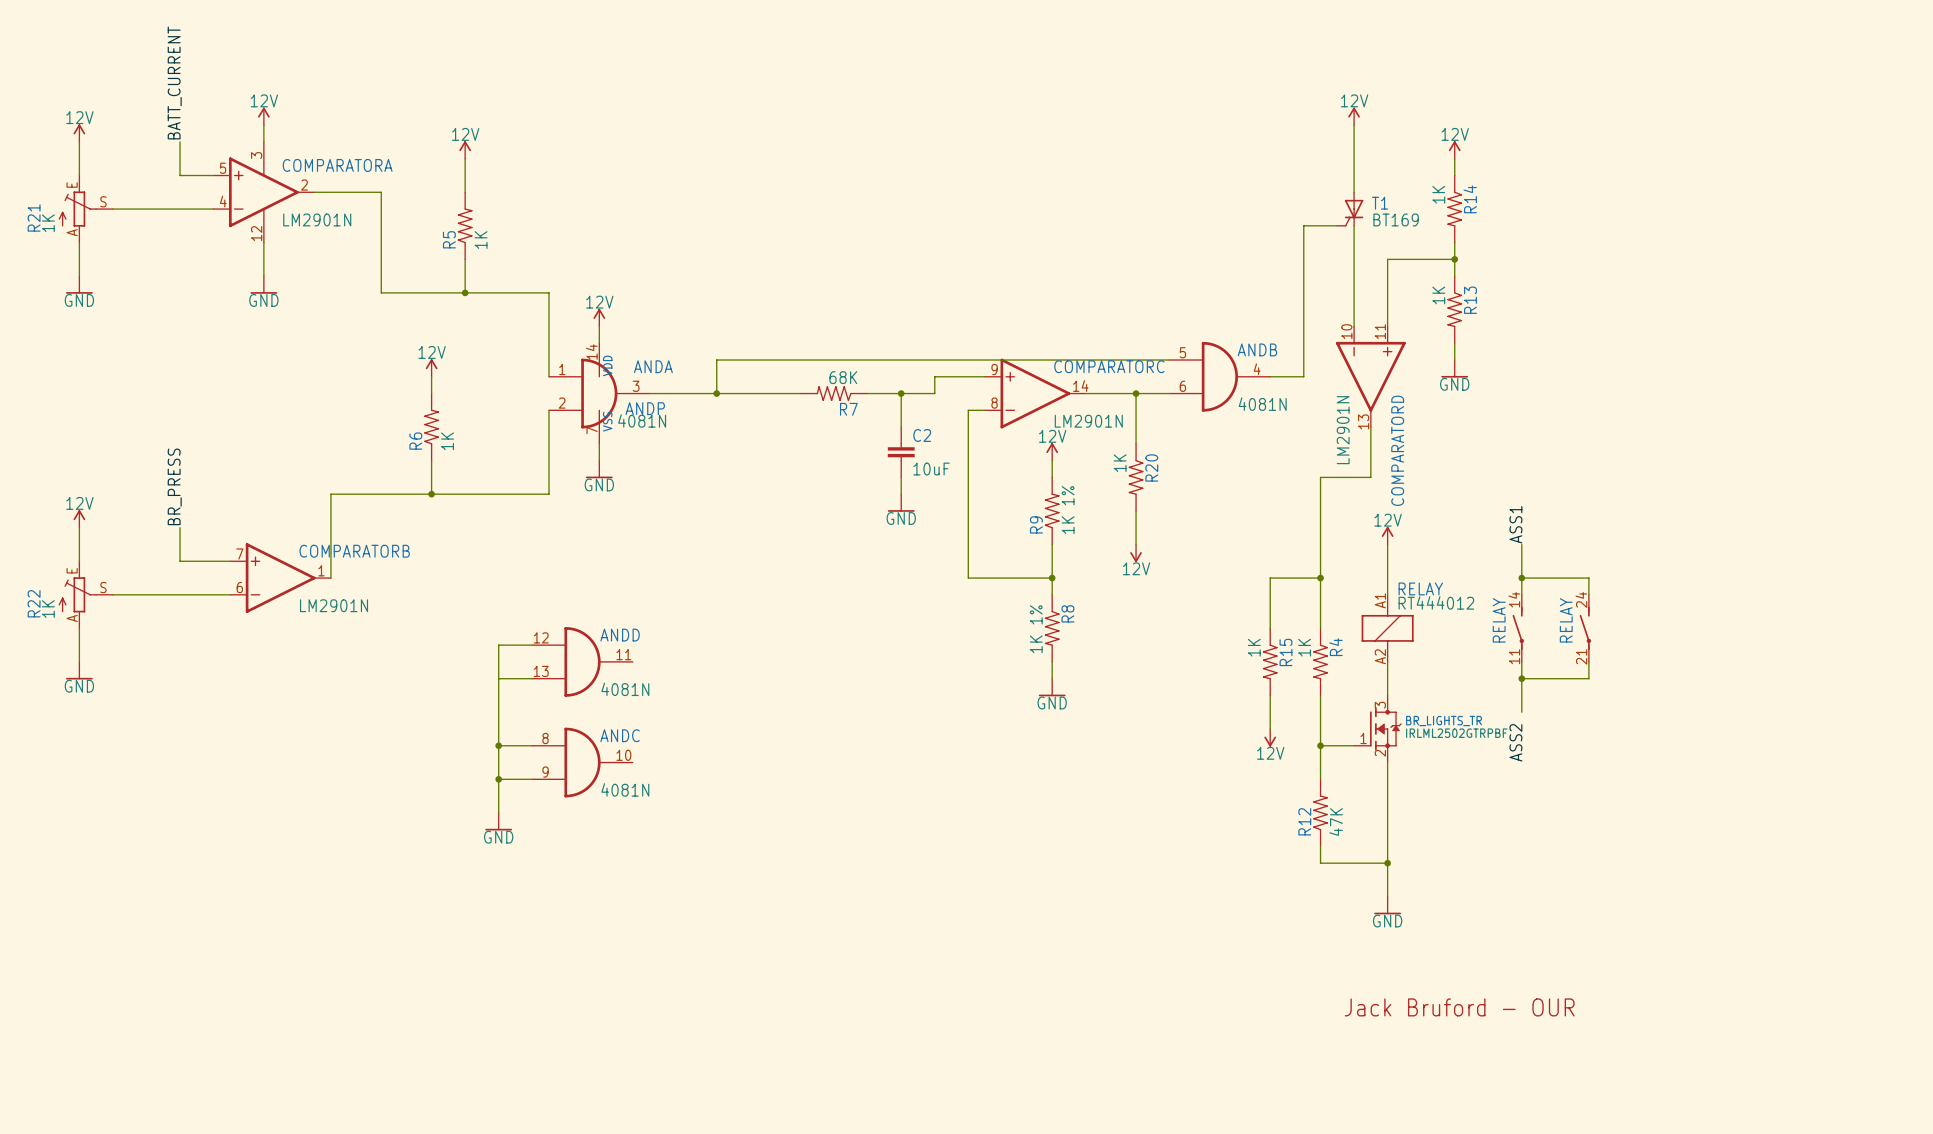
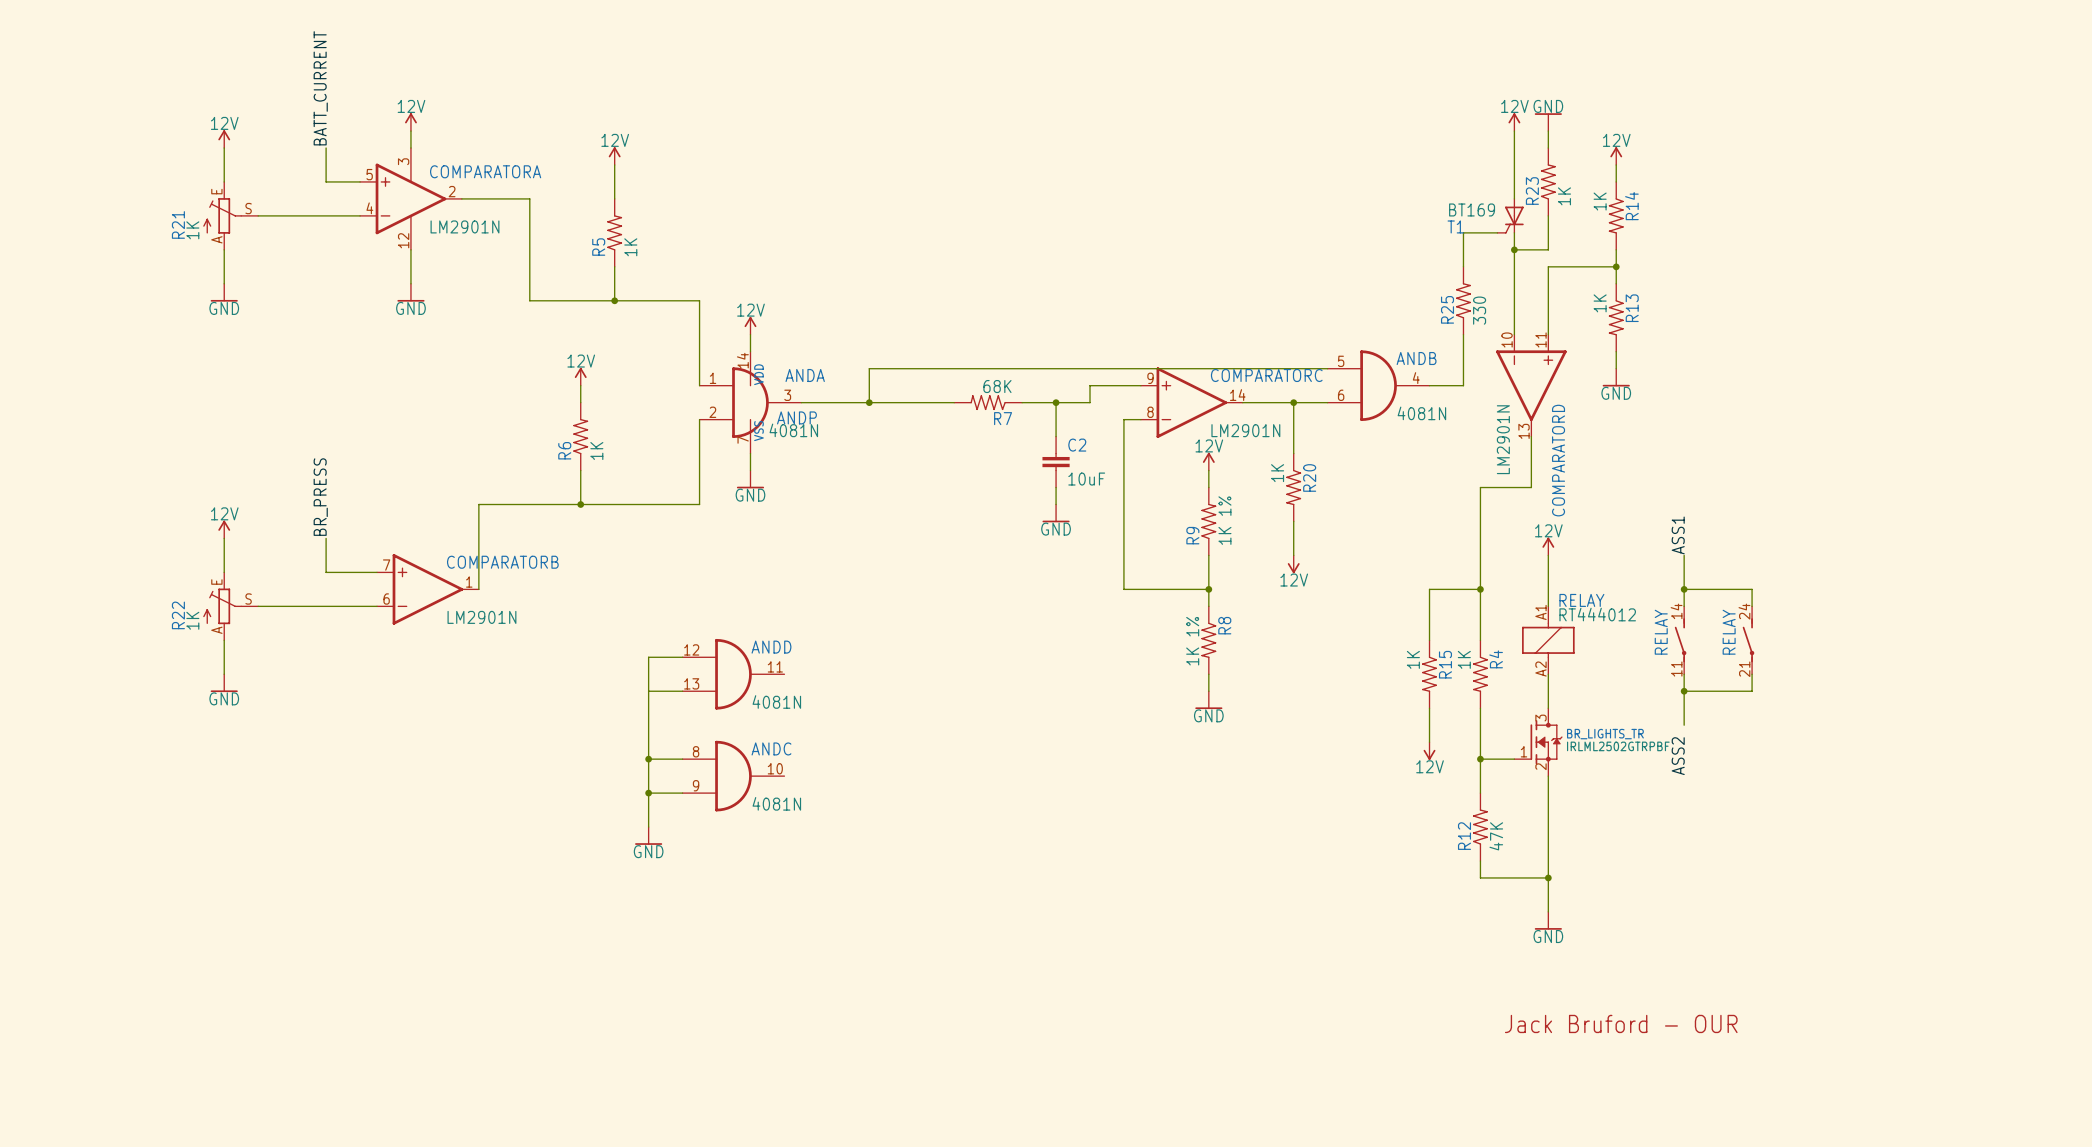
power symbol: none -> GND (1548, 122)
wire: none -> (1548, 131) (1548, 148)
R23: none -> 1K (1548, 181)
T1 name position: T1 (1380, 203) -> T1 (1455, 226)
wire: none -> (1548, 215) (1548, 249) (1514, 249)
T1 value position: BT169 (1396, 219) -> BT169 (1472, 209)
junction: none -> (1514, 249)
R25: none -> 330 (1463, 300)

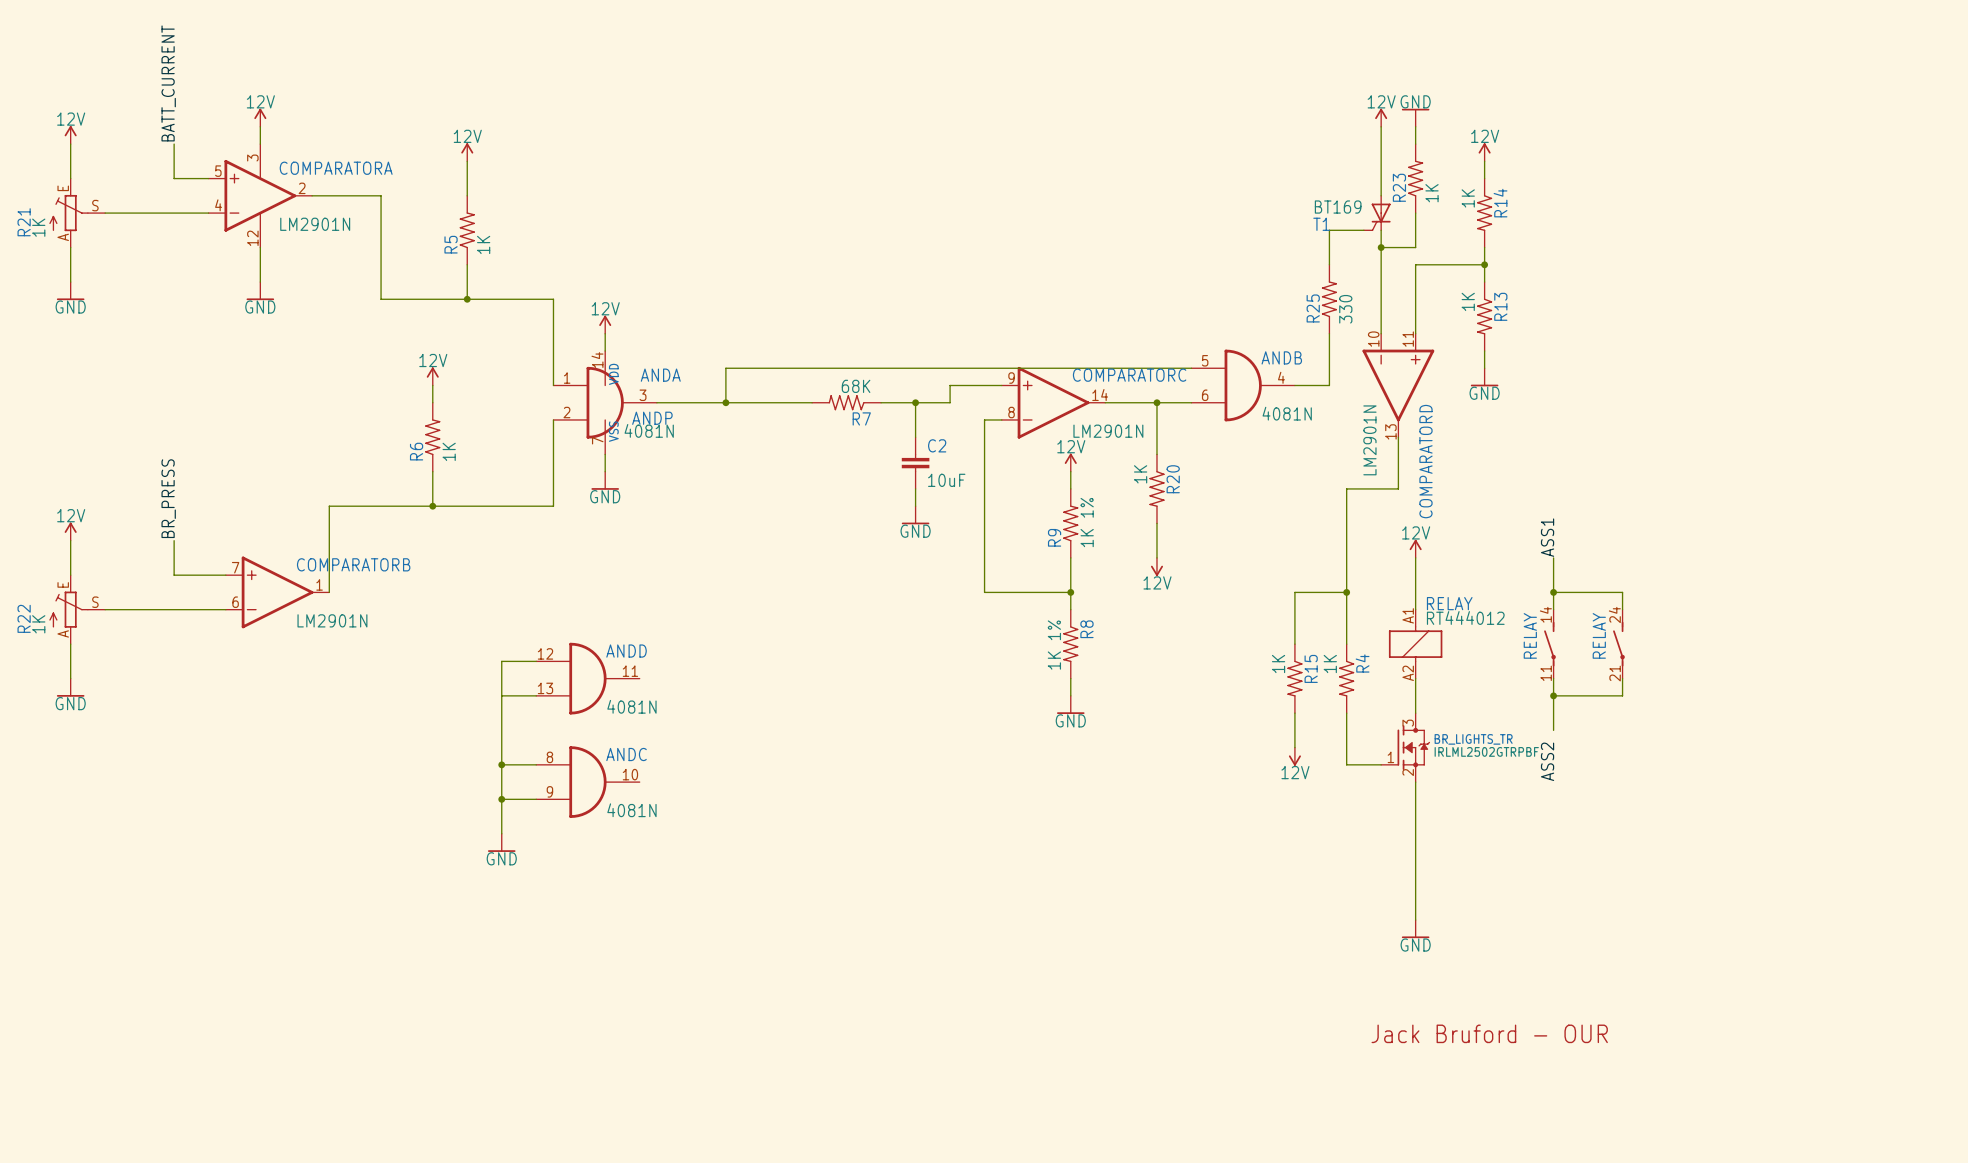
wire: (1480, 759) (1480, 793) -> none
junction: (1480, 759) -> none
R12: 47K (1480, 827) -> none
wire: (1480, 860) (1480, 877) (1548, 877) -> none
junction: (1548, 877) -> none

